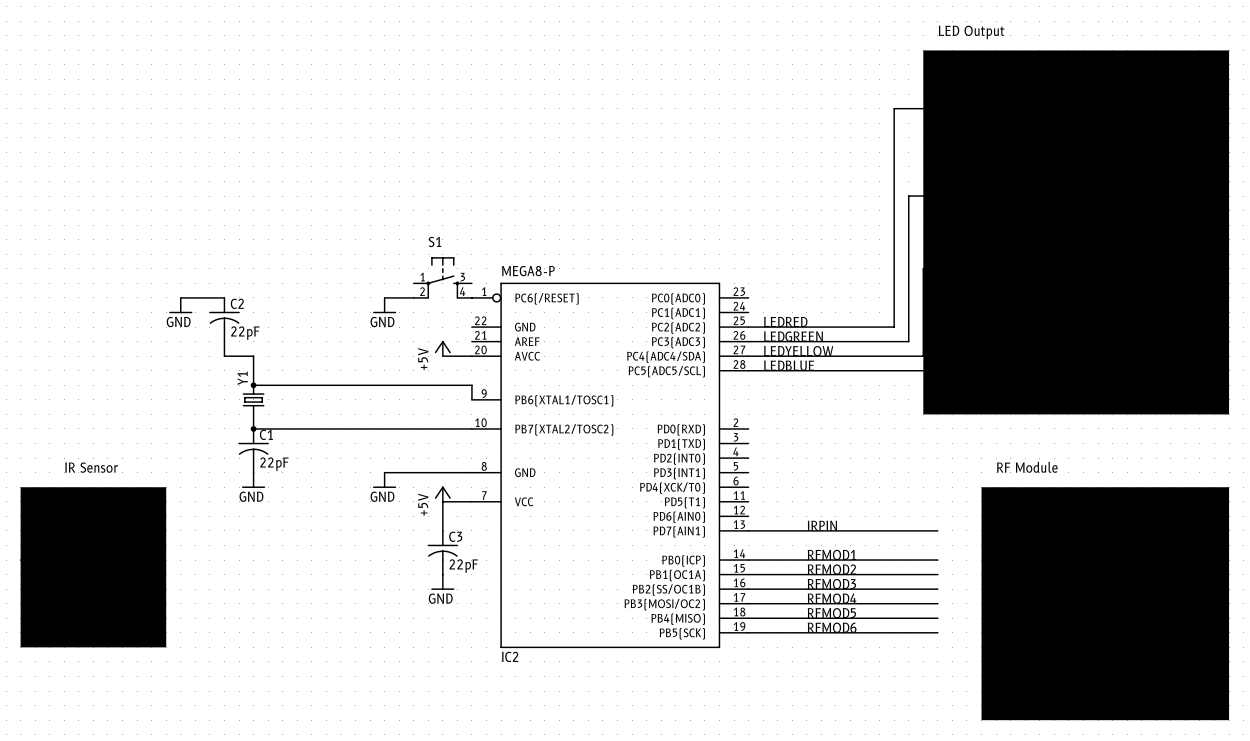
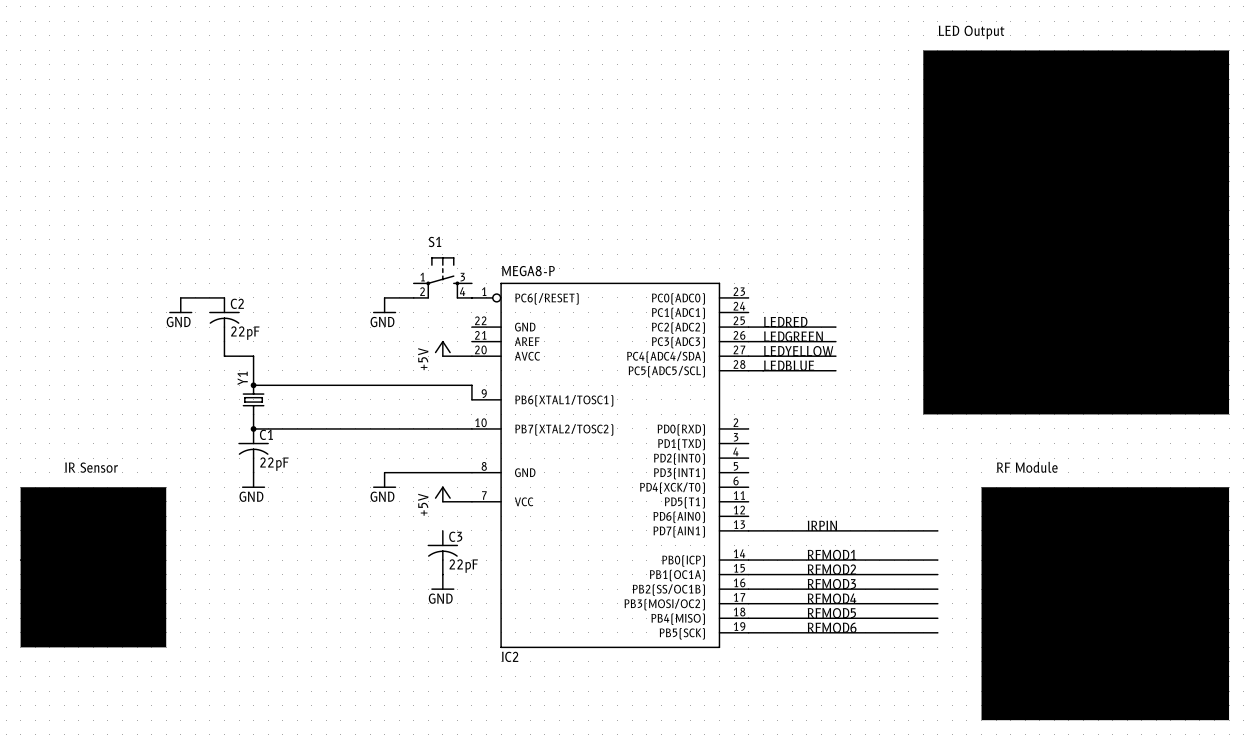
wire: (937, 108) (894, 108) (894, 327) (835, 327) -> none
wire: (937, 196) (908, 196) (908, 341) (835, 341) -> none
wire: (937, 268) (923, 268) (923, 356) (835, 356) -> none
wire: (937, 356) (937, 370) (835, 370) -> none
wire: (442, 501) (442, 530) -> none

